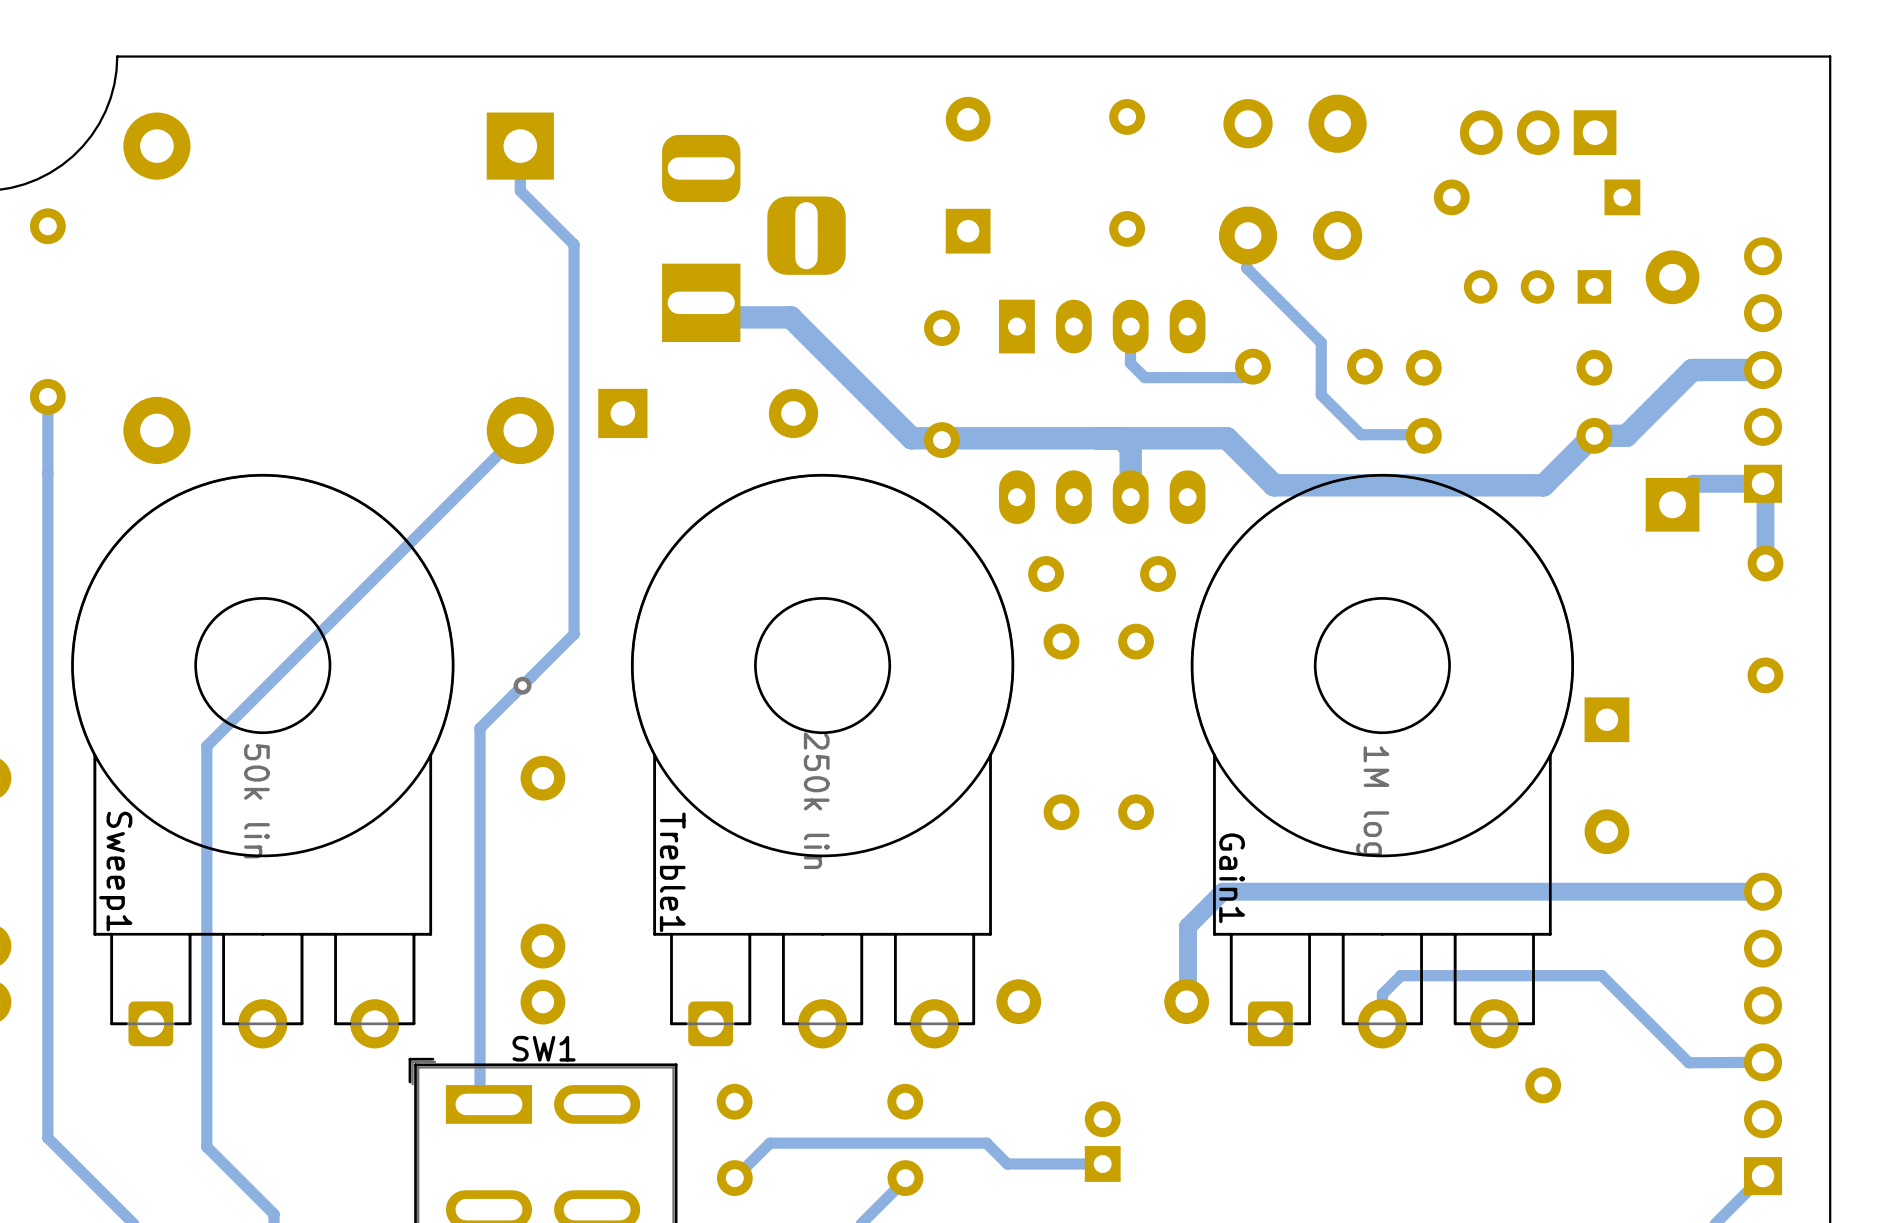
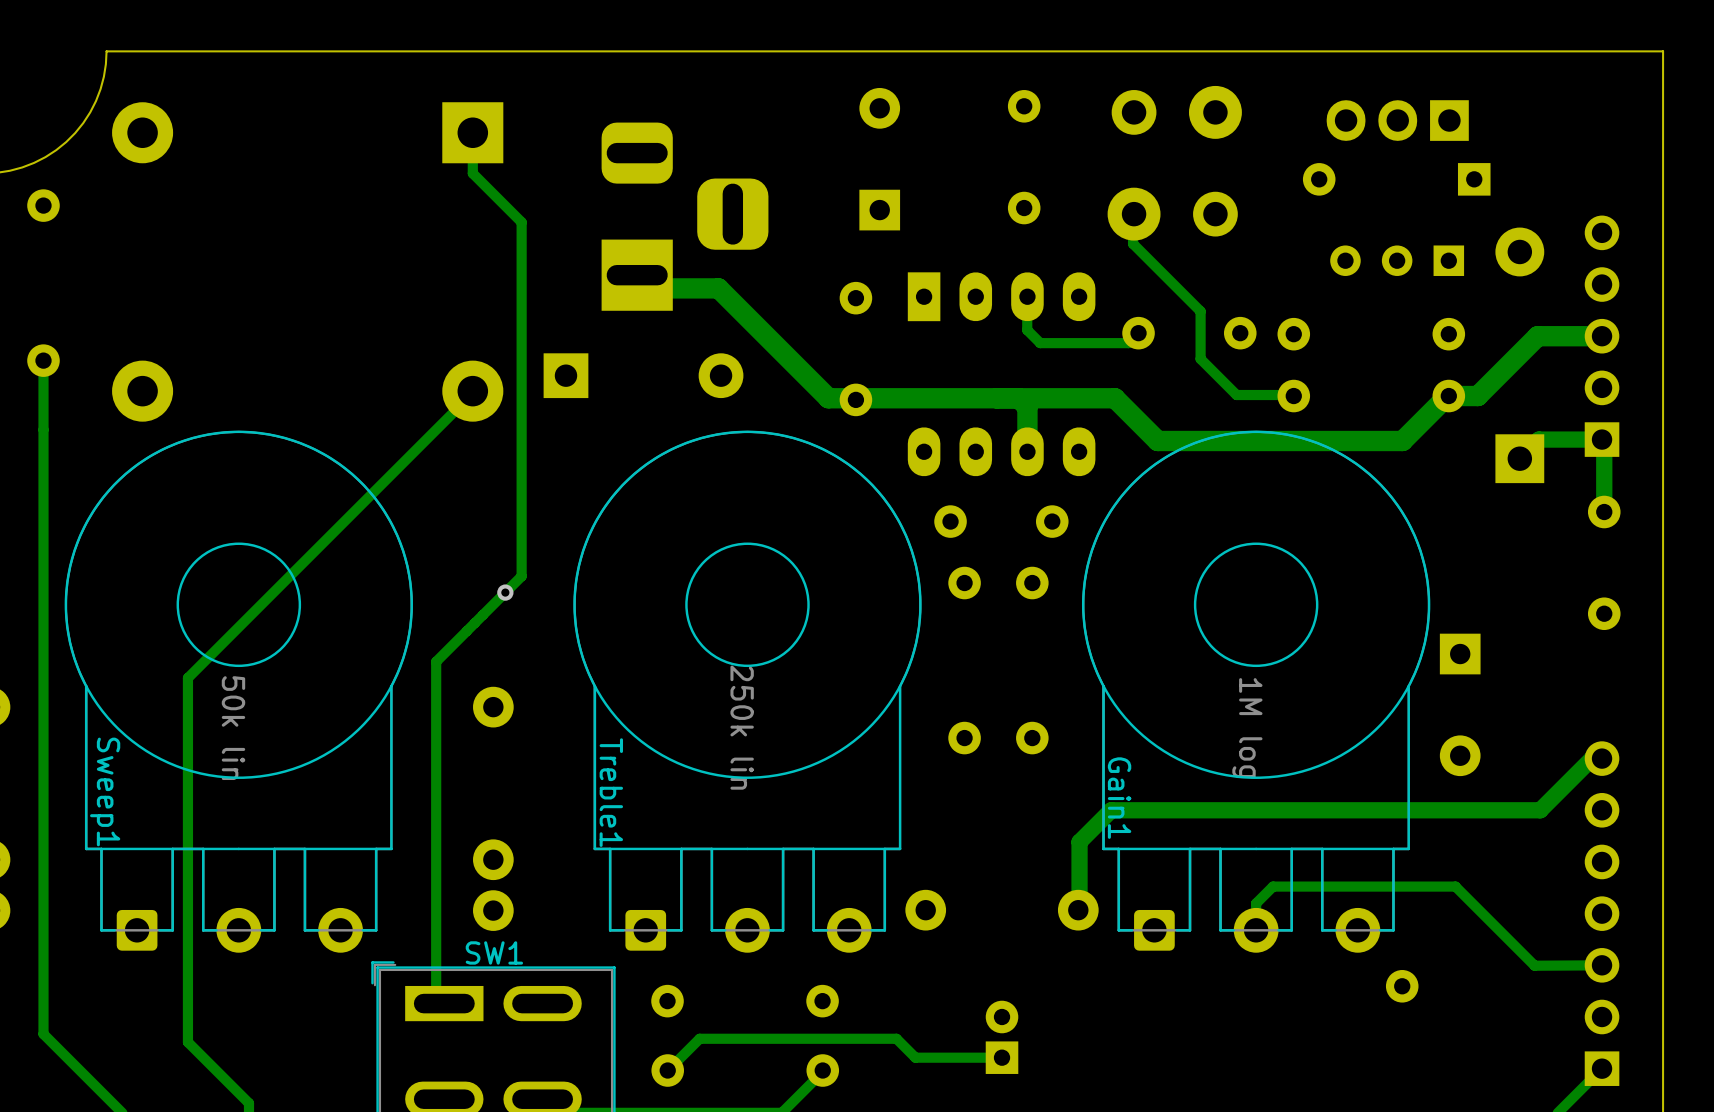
via position: (522, 685) -> (505, 592)
track: (1763, 891) (1695, 891) -> (1602, 758) (1591, 758) (1540, 810)
part: none -> (1602, 913)
part: (1763, 1033) -> none

